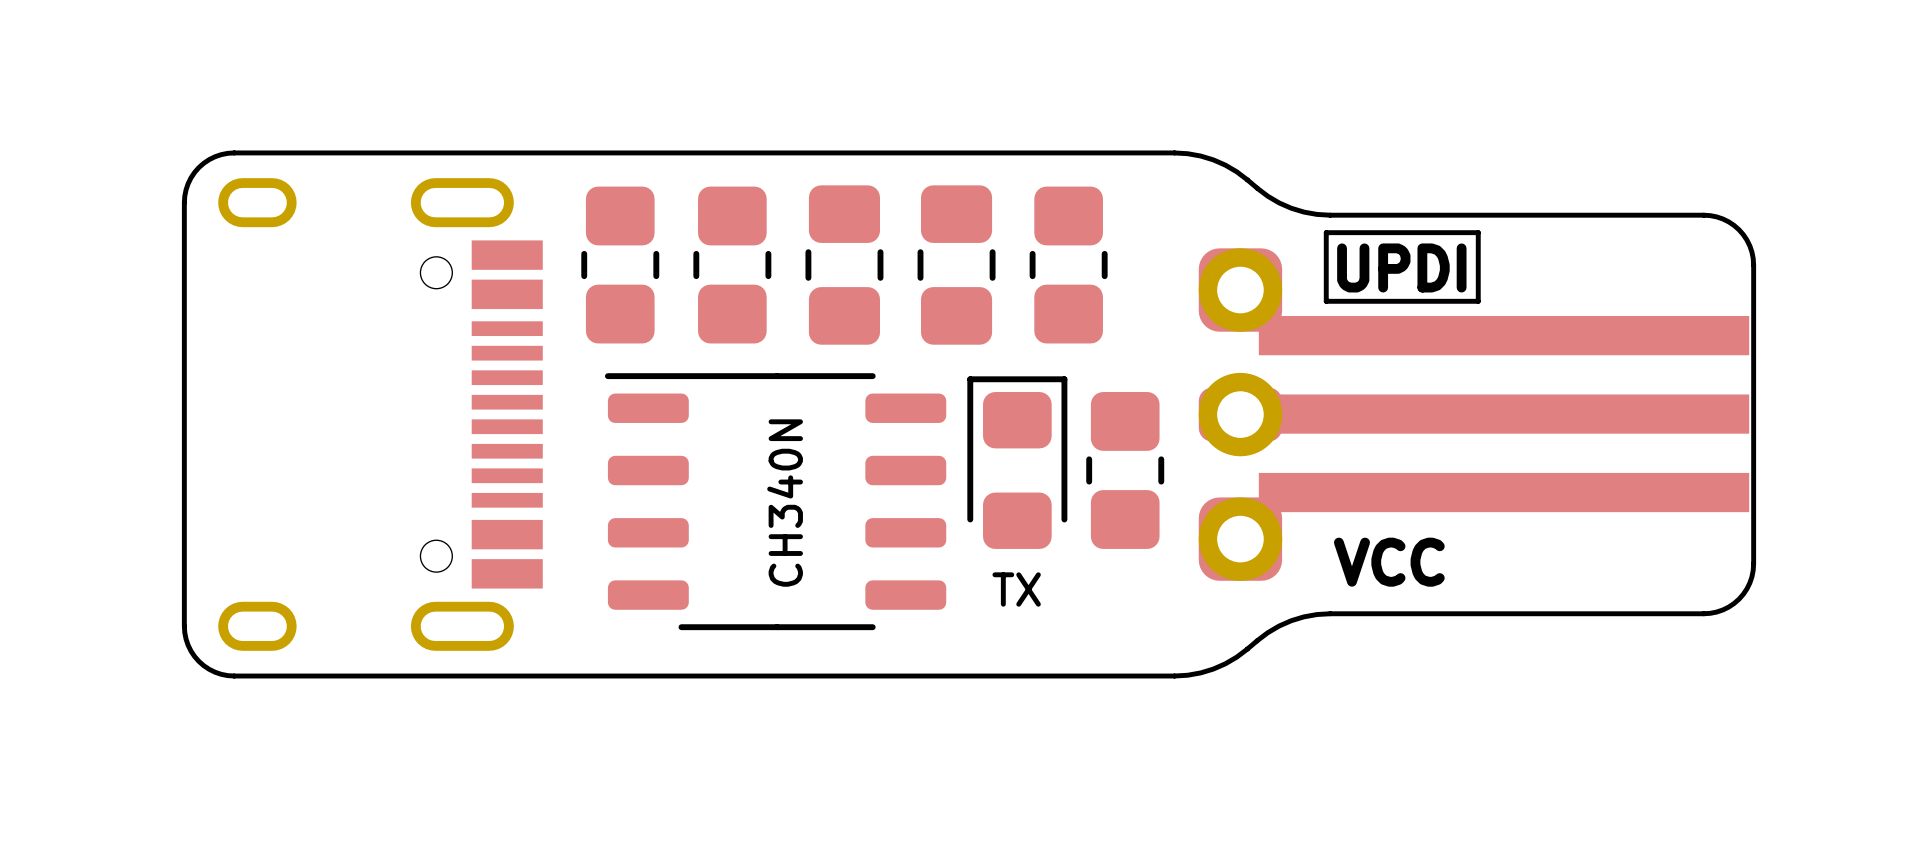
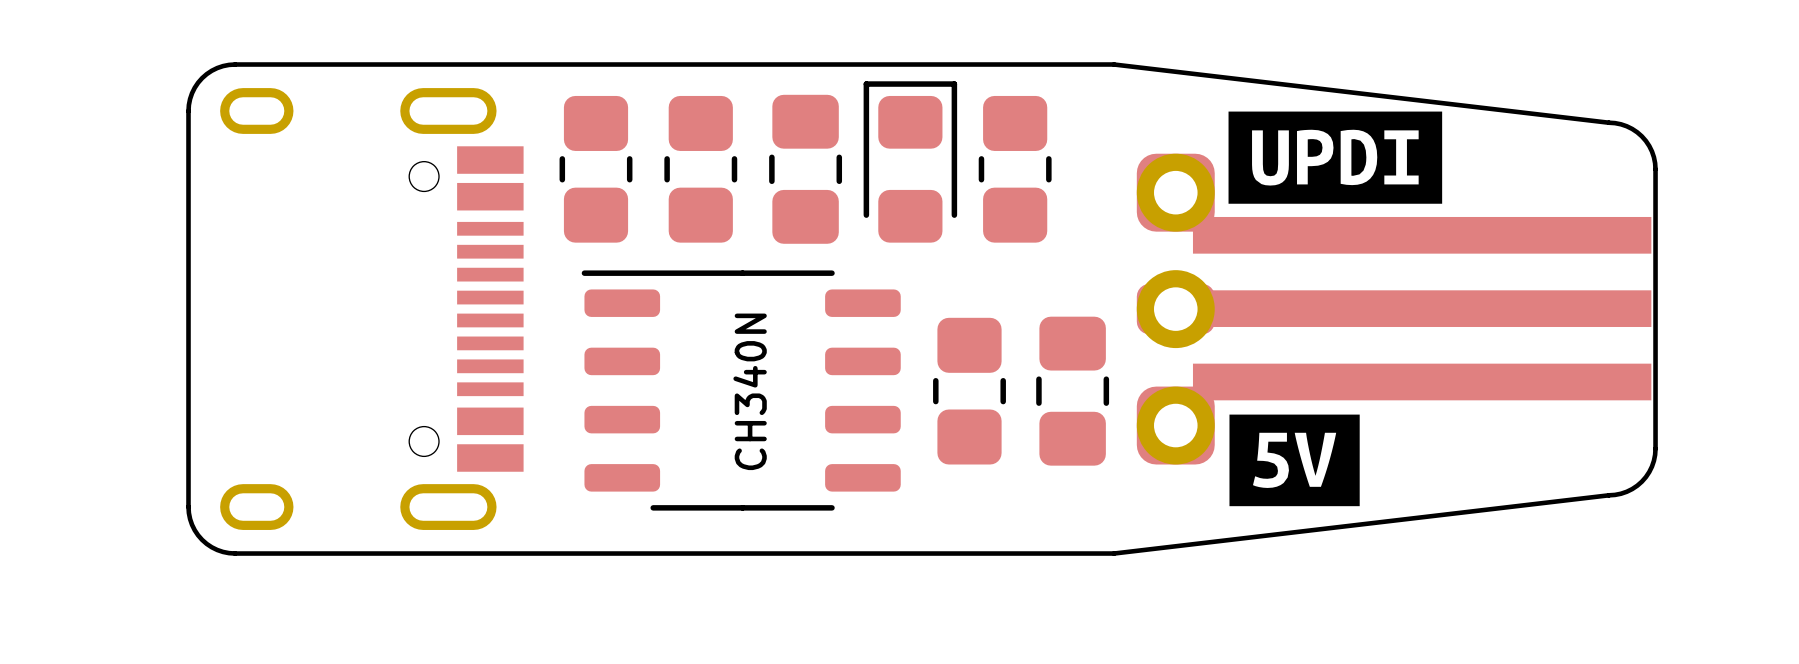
board edge: (1174, 152) (1200, 156) (1213, 159) (1236, 171) (1279, 202) (1303, 212) (1316, 214) (1703, 215) -> (1114, 64) (1608, 122)
part footprint: [917, 185, 996, 345] -> [863, 81, 958, 243]
drawing: none -> [1228, 111, 1443, 204]
line: (1326, 232) (1478, 232) (1478, 301) (1326, 301) (1326, 232) -> none
text: UPDI (1401, 267) -> none
part footprint: [967, 376, 1068, 549] -> [933, 317, 1006, 465]
part footprint: [1086, 392, 1165, 549] -> [1036, 316, 1110, 466]
drawing: none -> [1229, 414, 1360, 507]
text: VCC (1389, 562) -> none
text: TX (1016, 589) -> none
board edge: (1703, 613) (1316, 614) (1303, 616) (1279, 626) (1236, 657) (1213, 669) (1200, 672) (1174, 676) -> (1608, 495) (1114, 553)

